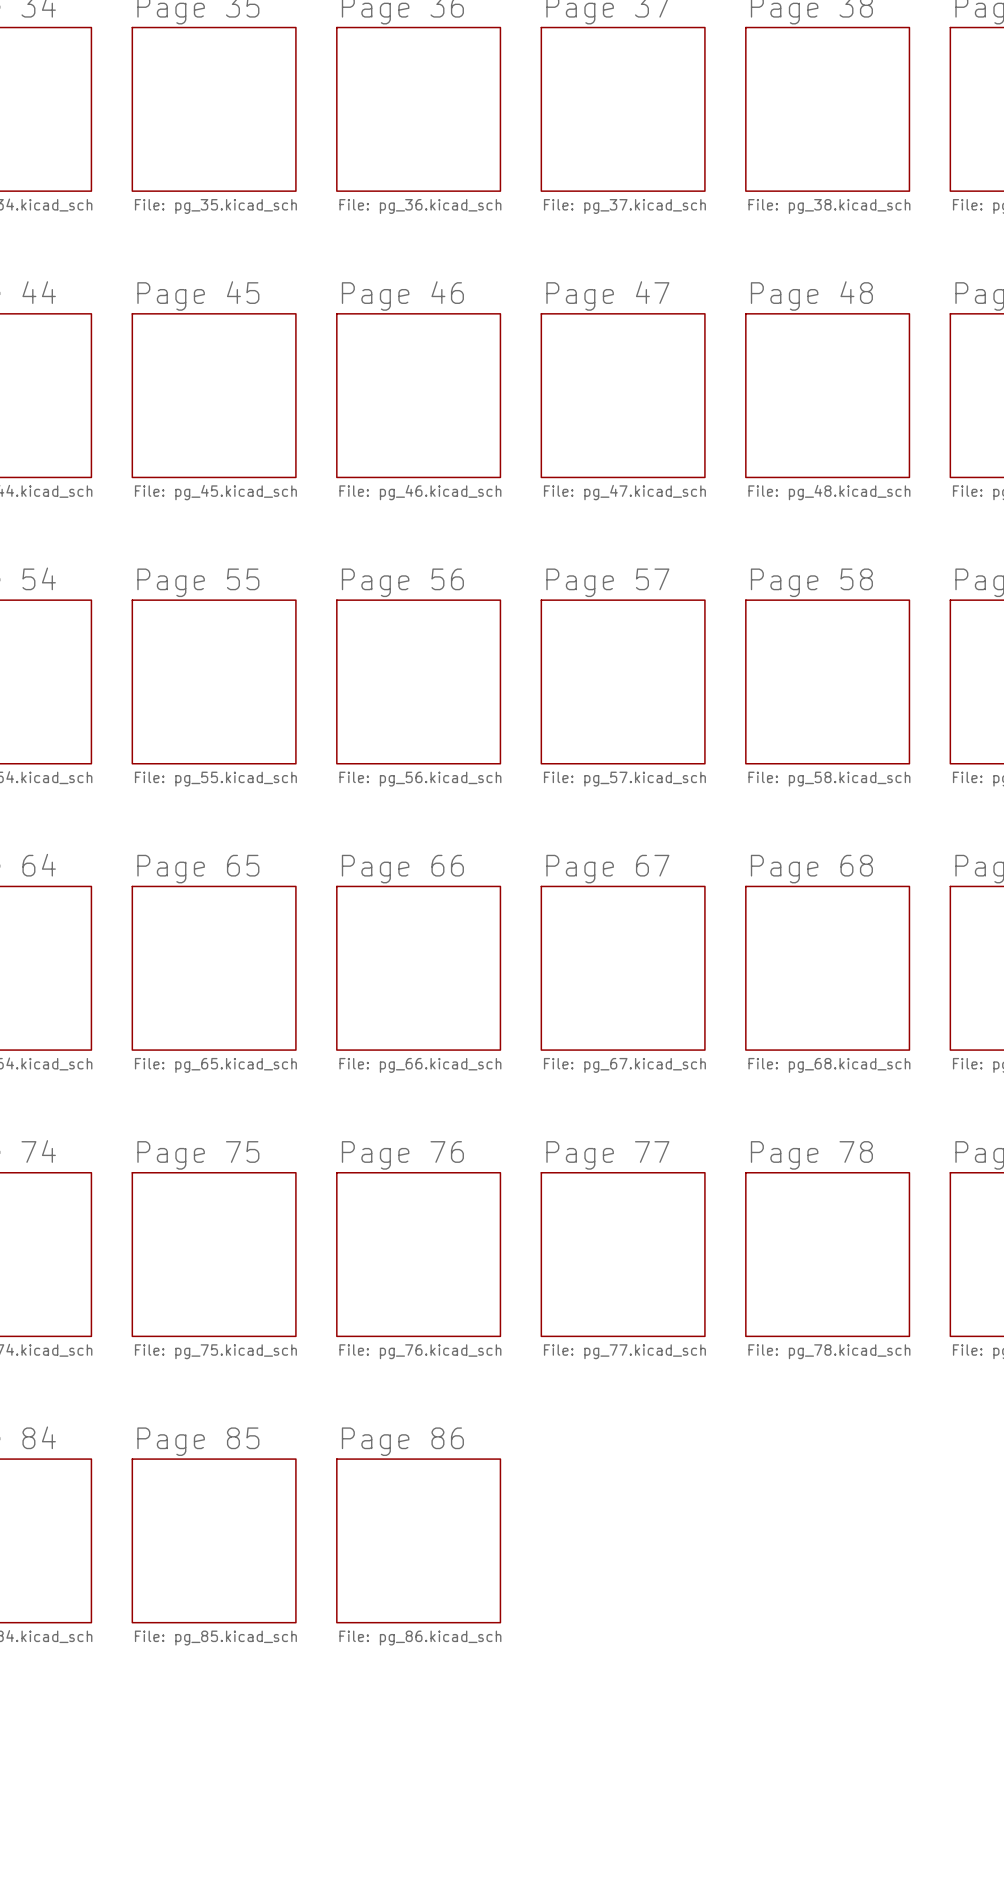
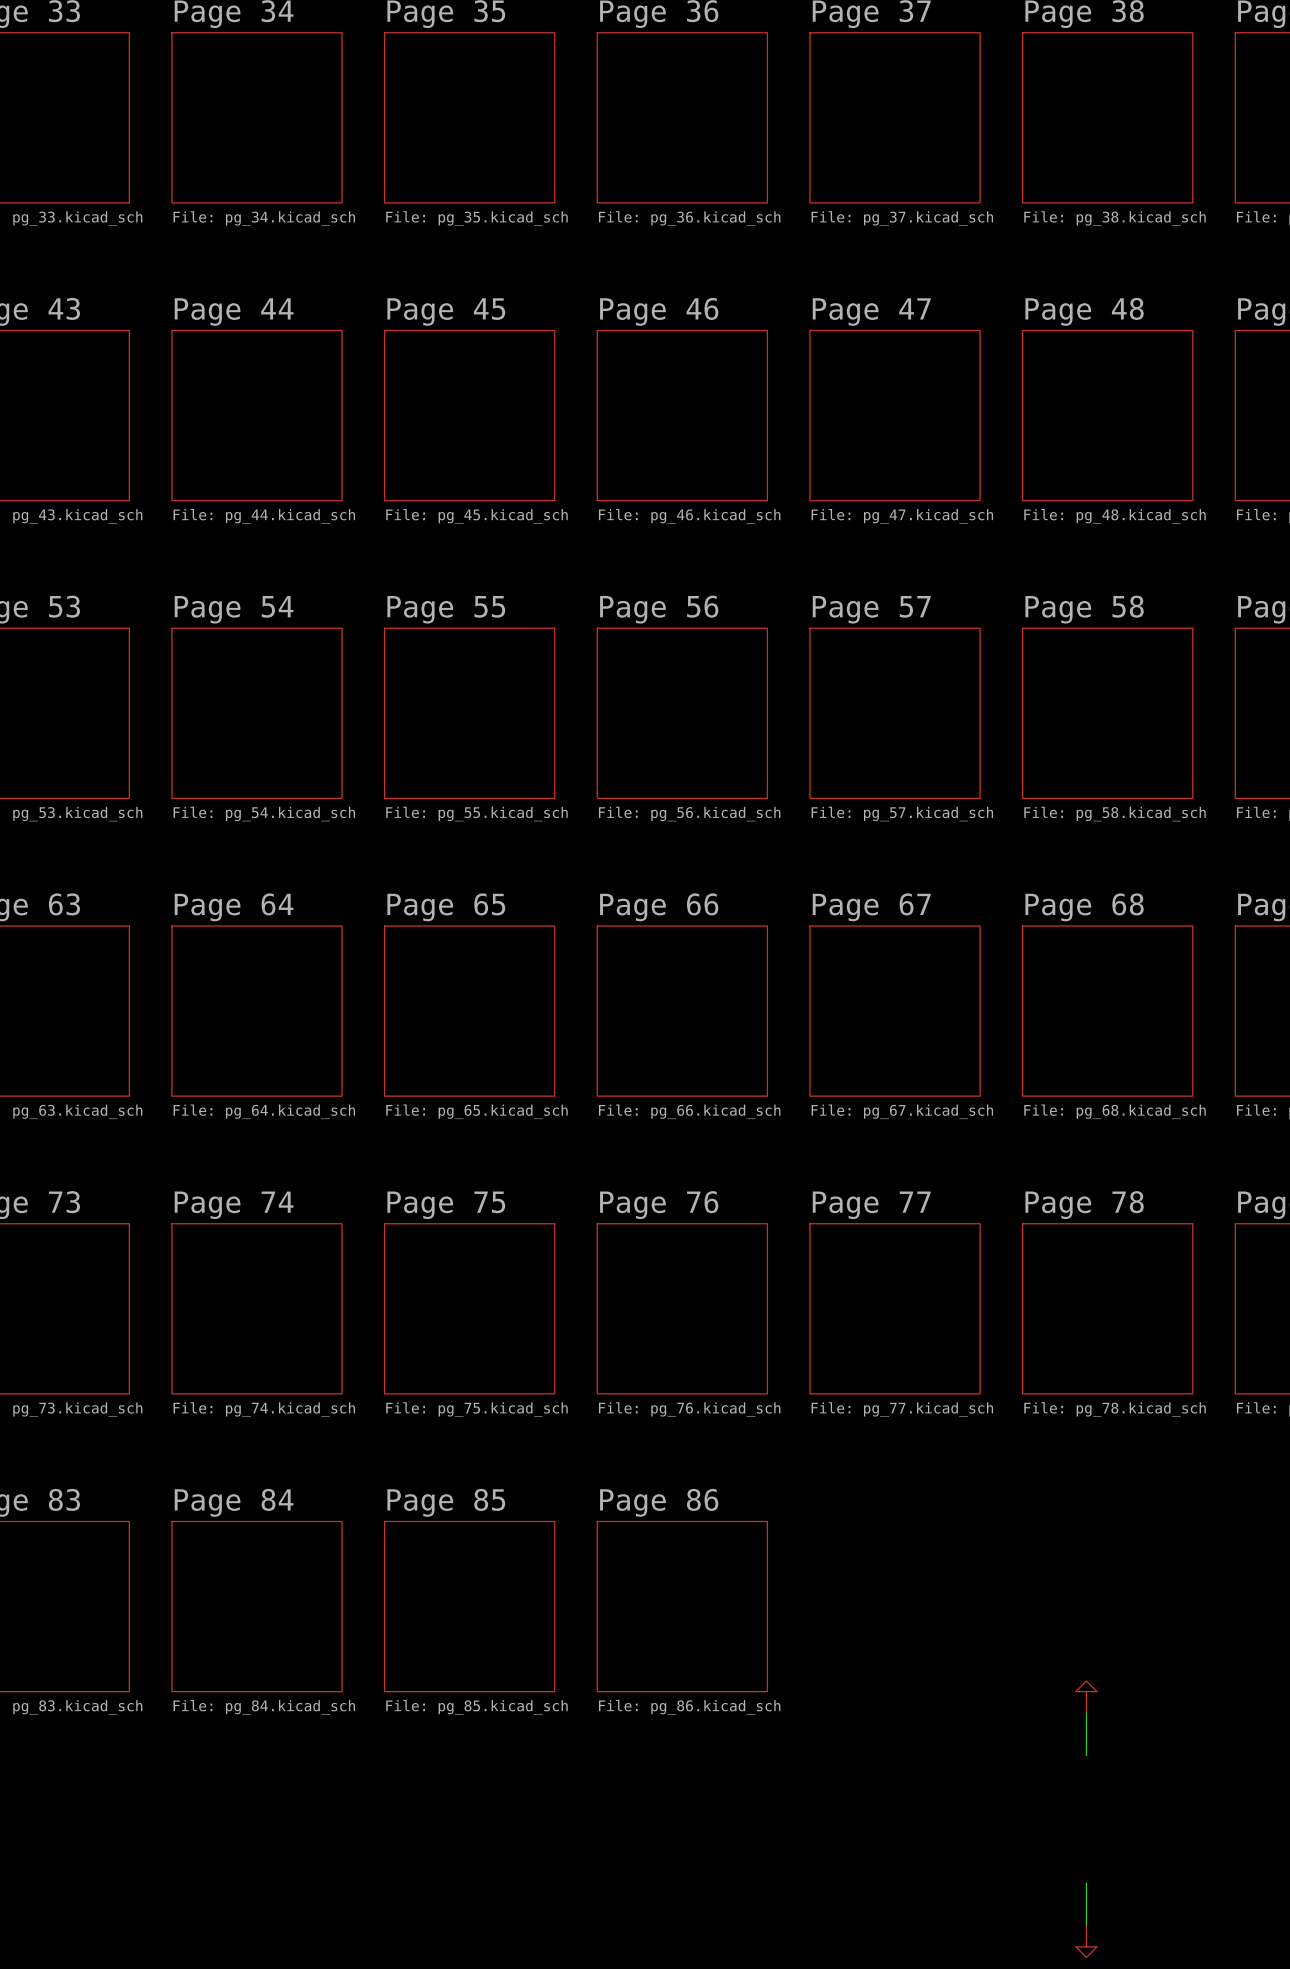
power symbol: none -> (1086, 1696)
wire: none -> (1086, 1712) (1086, 1755)
wire: none -> (1086, 1883) (1086, 1925)
power symbol: none -> (1086, 1941)

